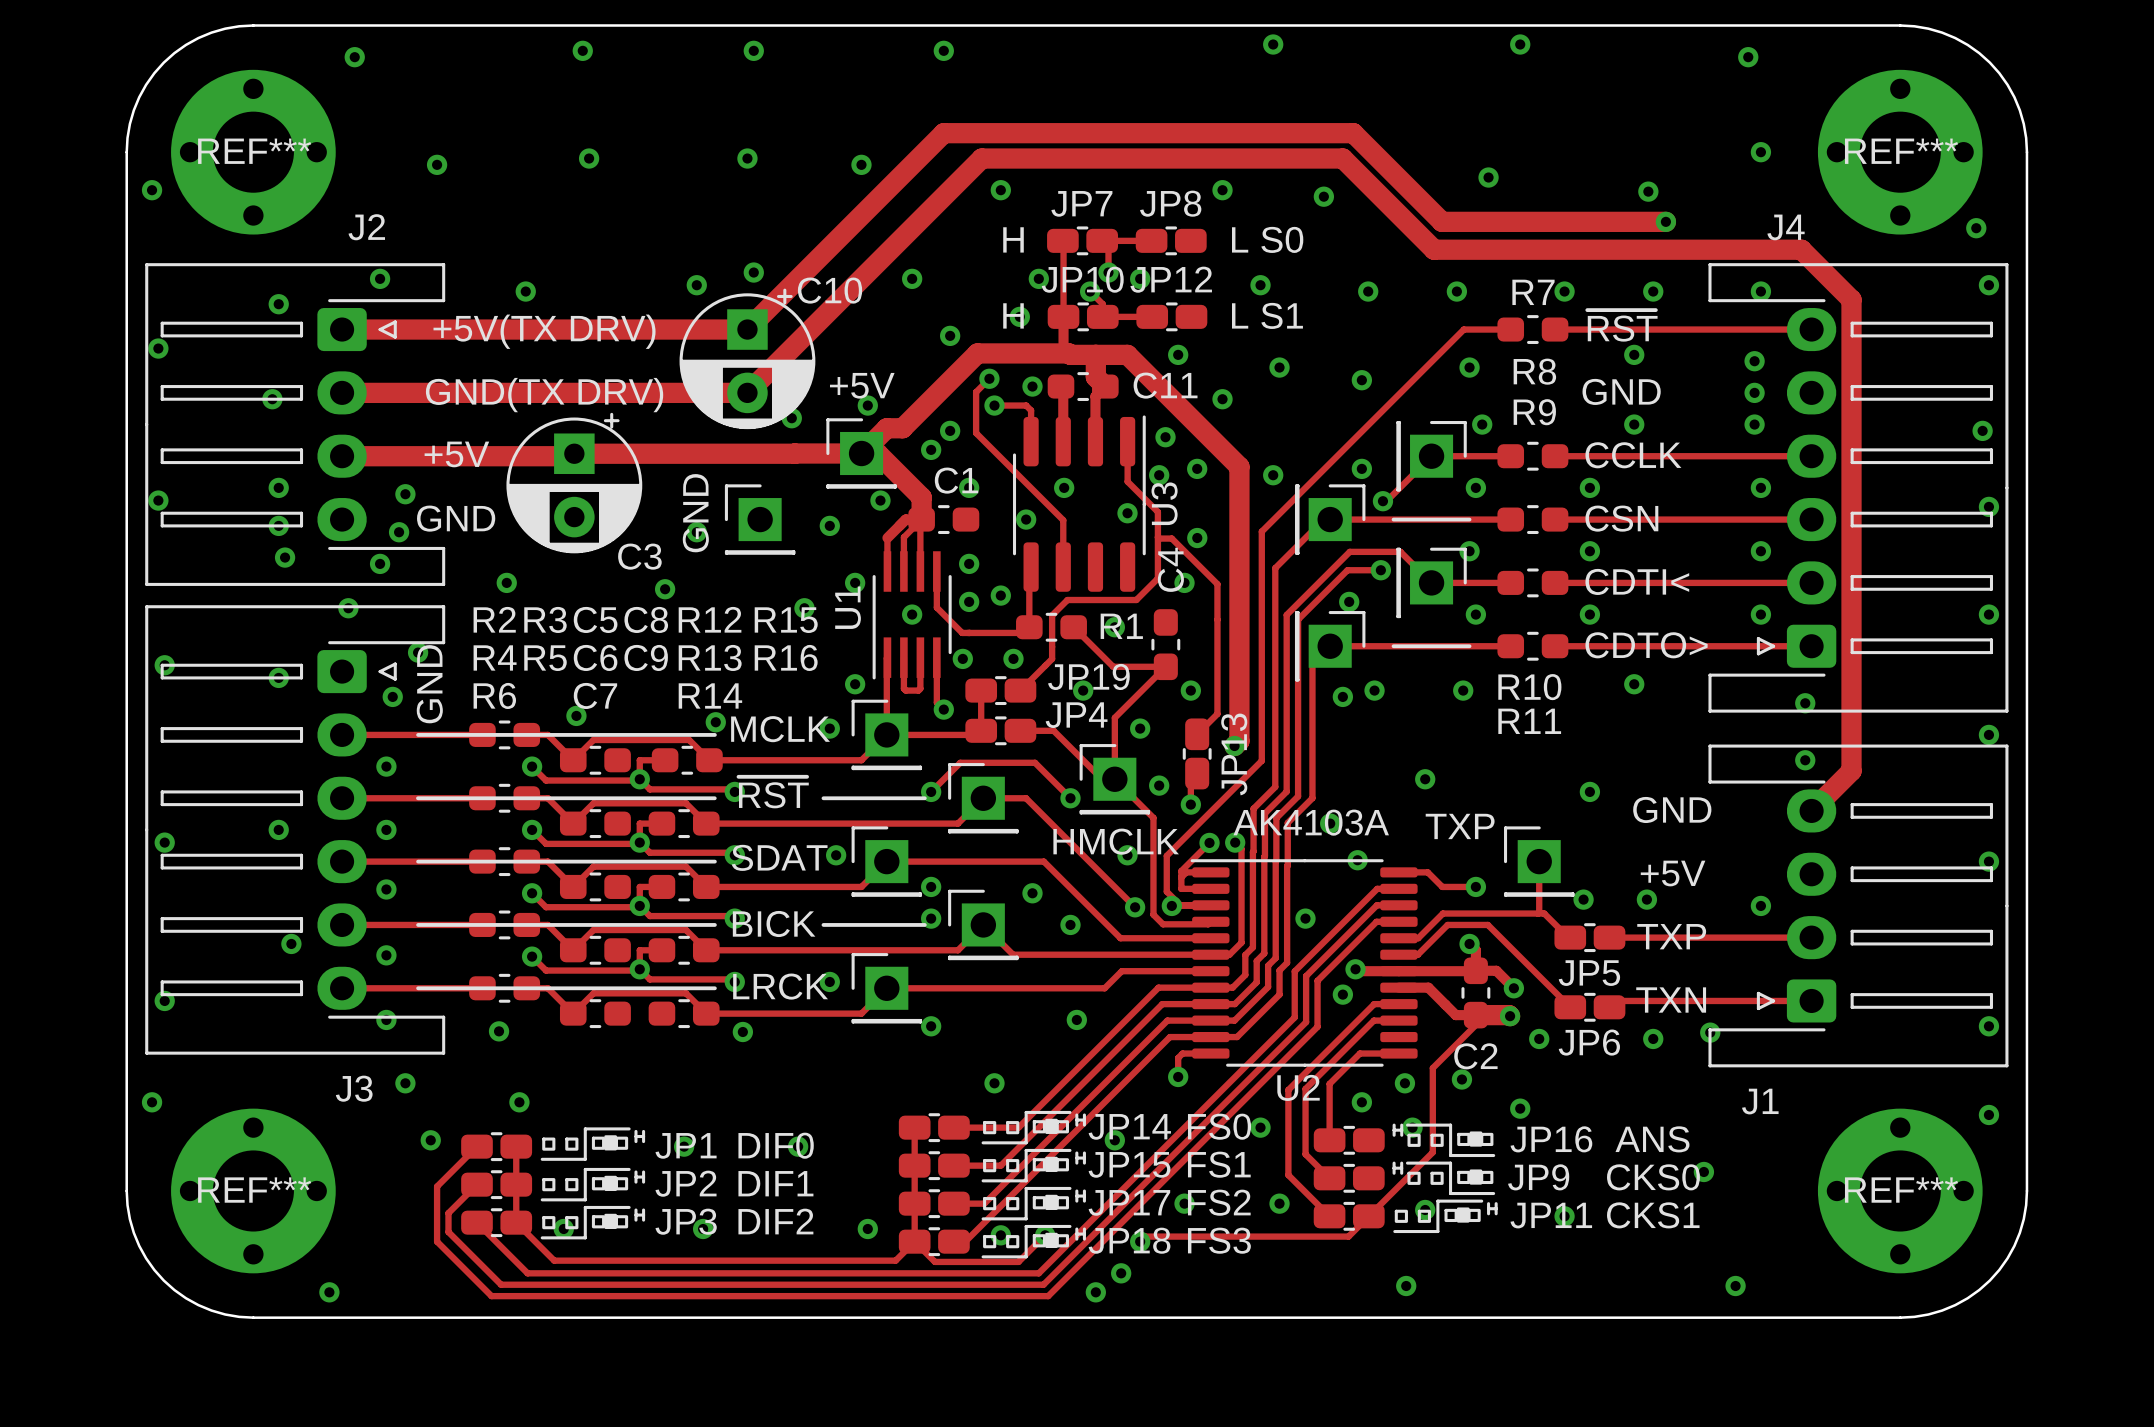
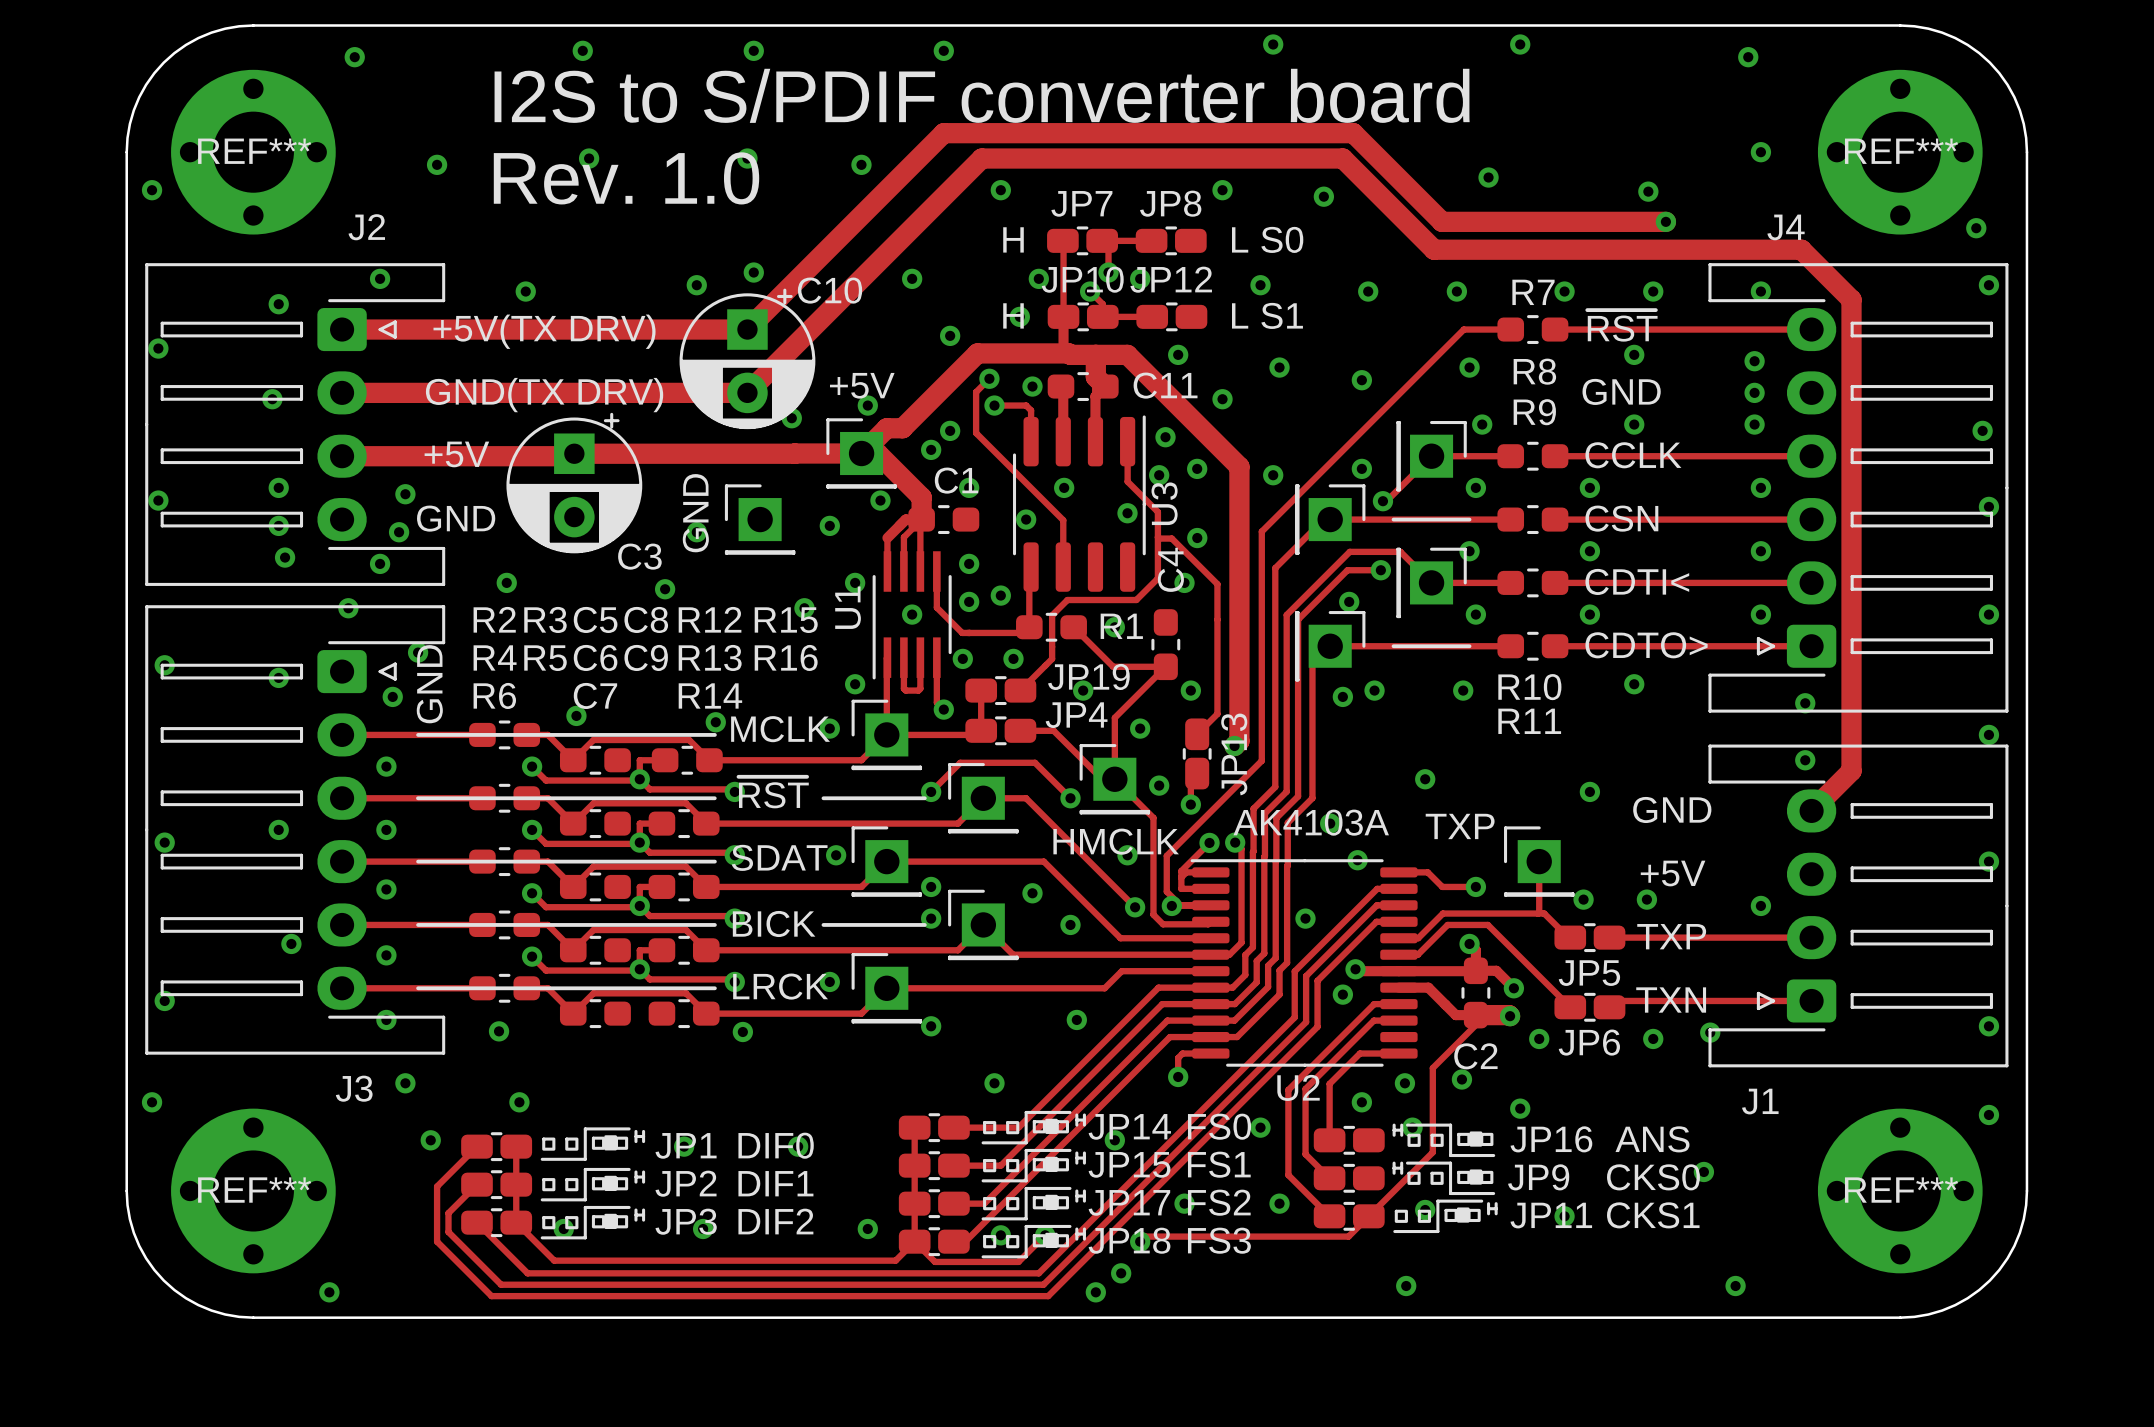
text: none -> I2S to S/PDIF converter board (982, 95)
text: none -> Rev. 1.0 (626, 178)

